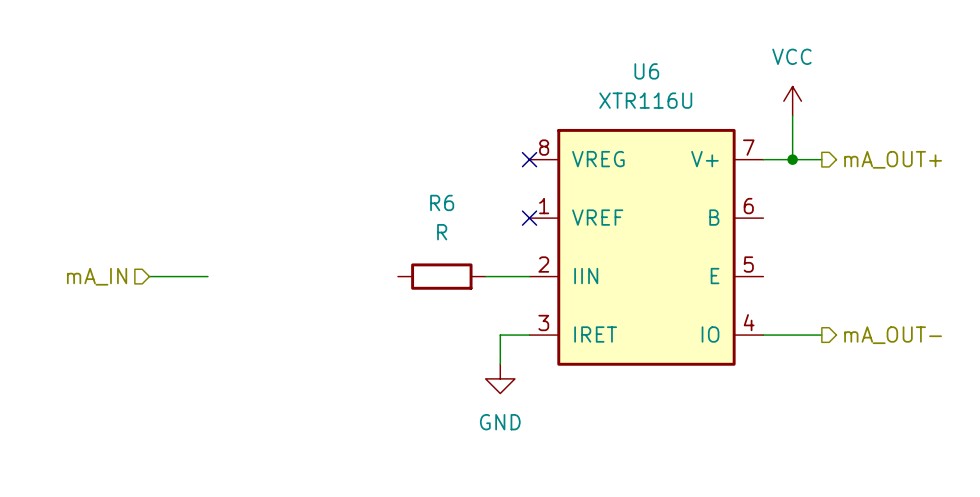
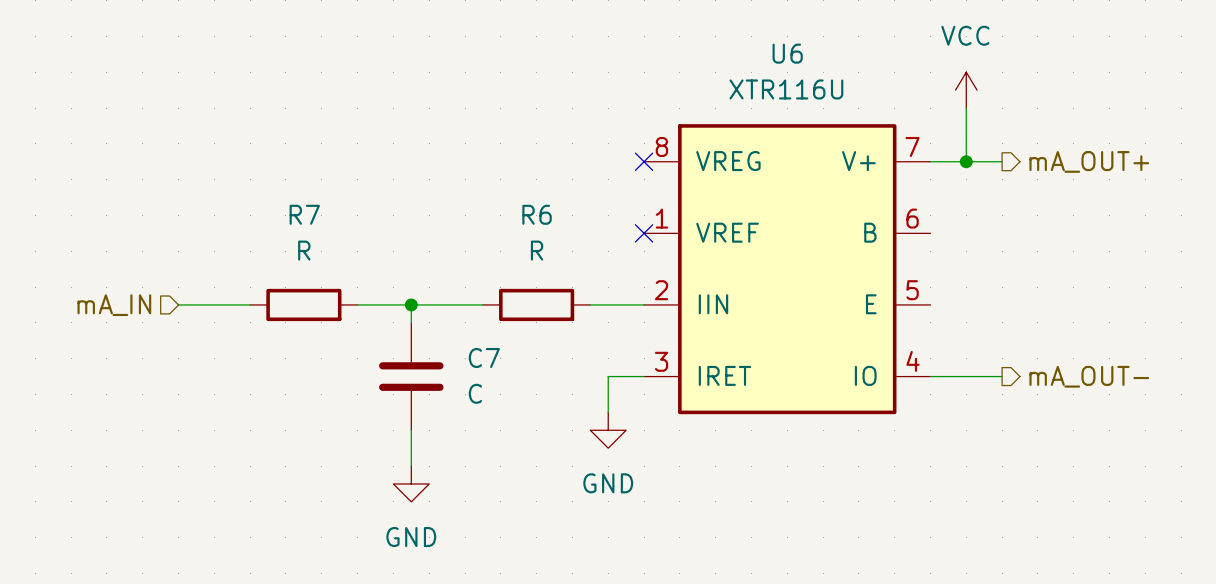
R7: none -> R (303, 304)
wire: none -> (357, 304) (482, 304)
wire: none -> (411, 304) (411, 322)
junction: none -> (411, 304)
C7: none -> C (411, 376)
wire: none -> (411, 430) (411, 466)
power symbol: none -> GND (411, 483)

